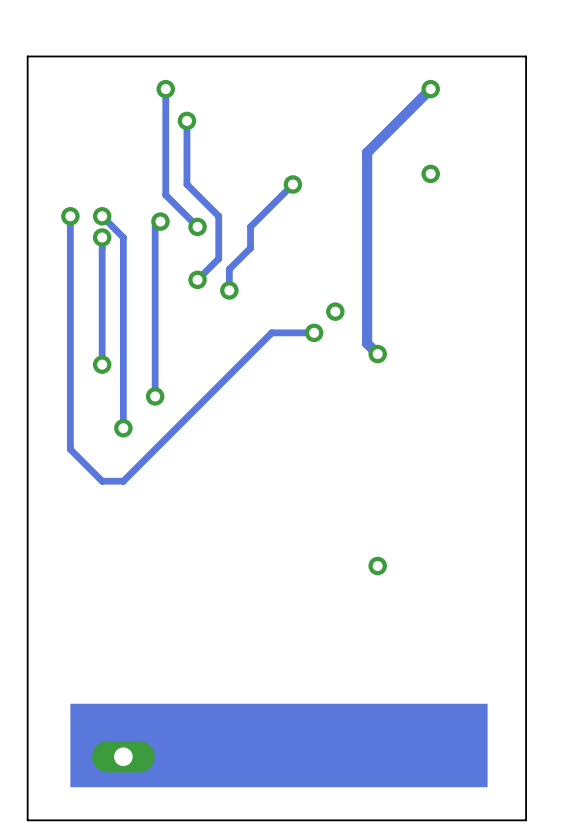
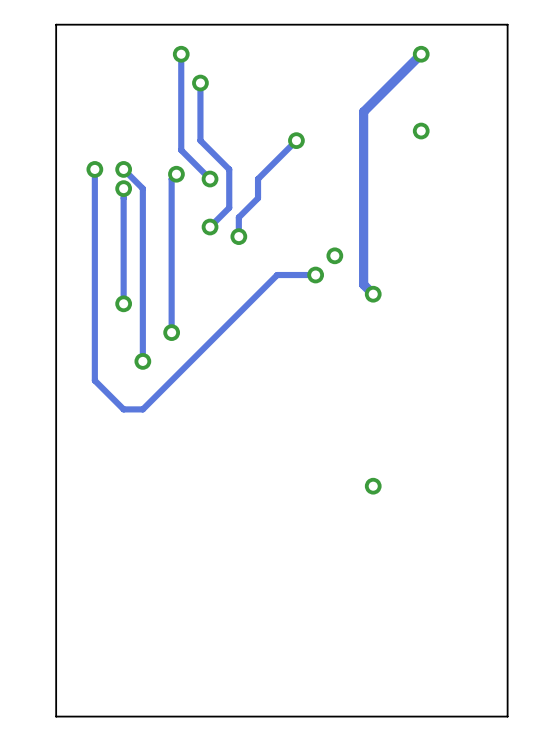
drawing: [70, 703, 488, 788] -> none
part: (123, 756) -> none

